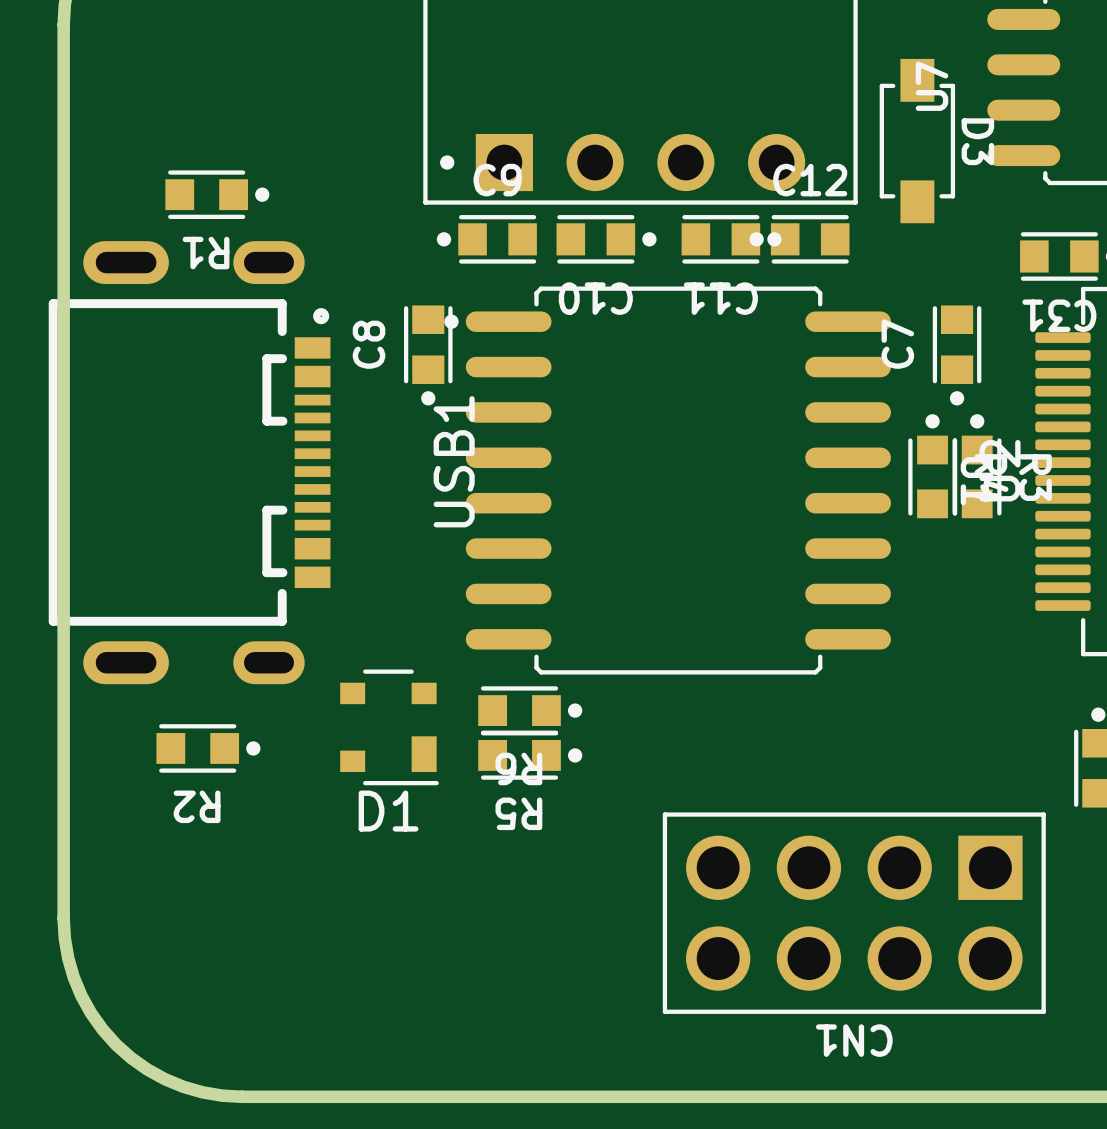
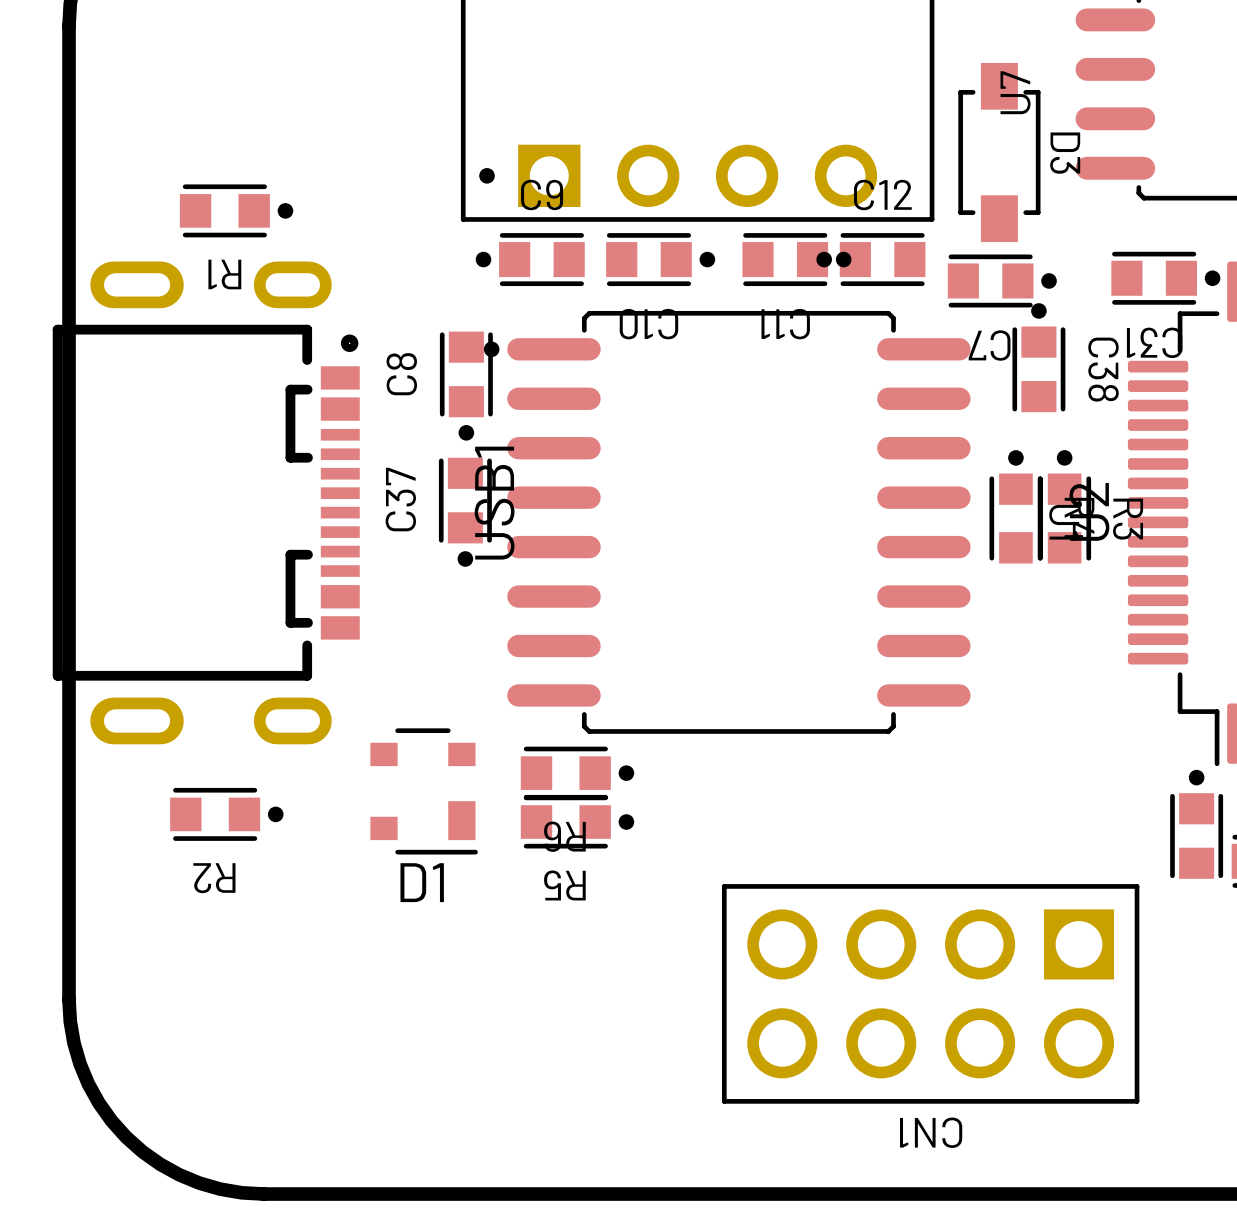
C38: none -> (1038, 357)
C7 rotation: 0° (957, 355) -> 90° counterclockwise (1002, 280)
C7 position: (957, 355) -> (1002, 280)
C37: none -> (465, 512)

